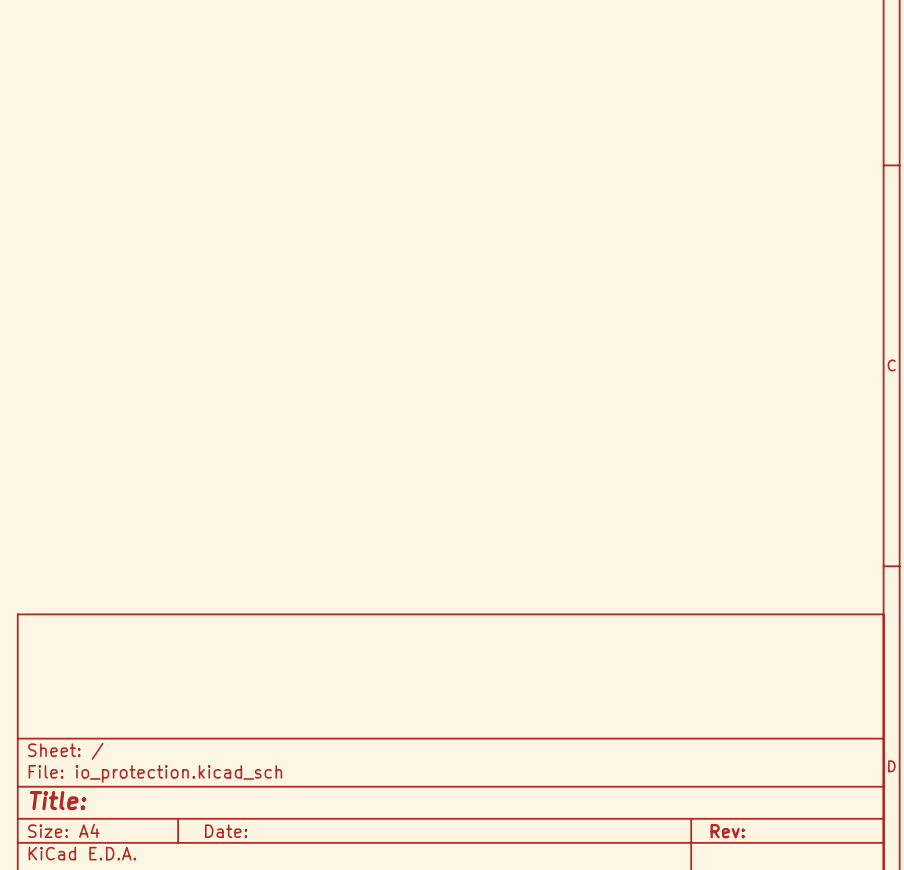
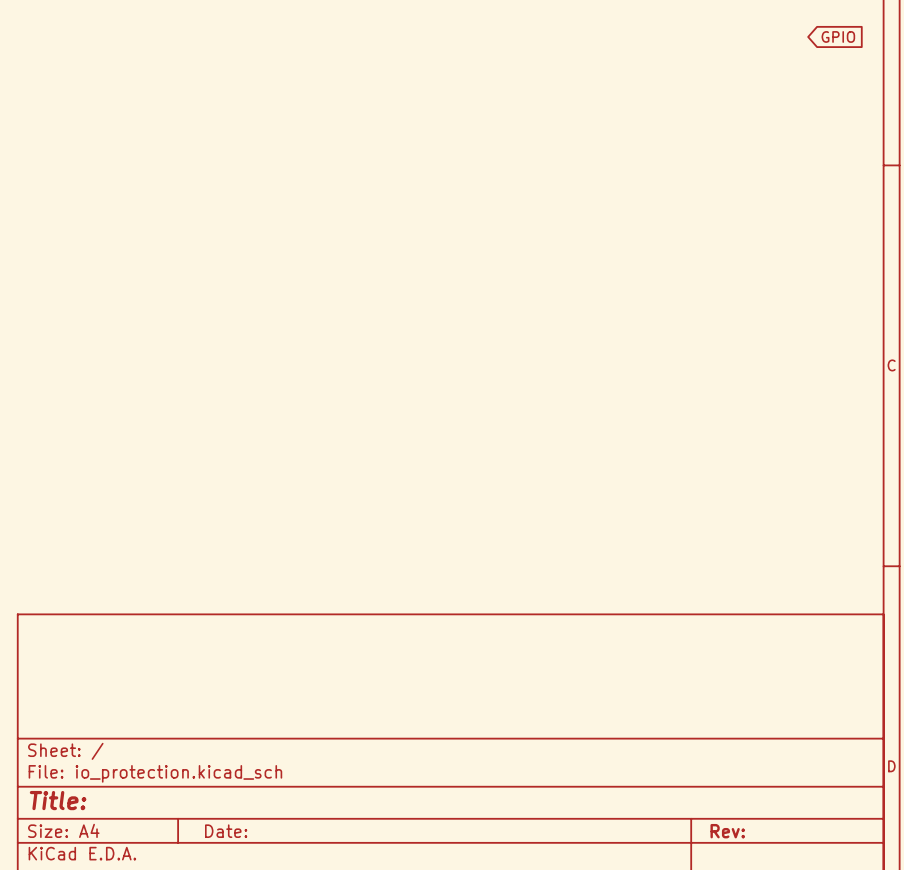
global label: none -> GPIO (838, 36)

